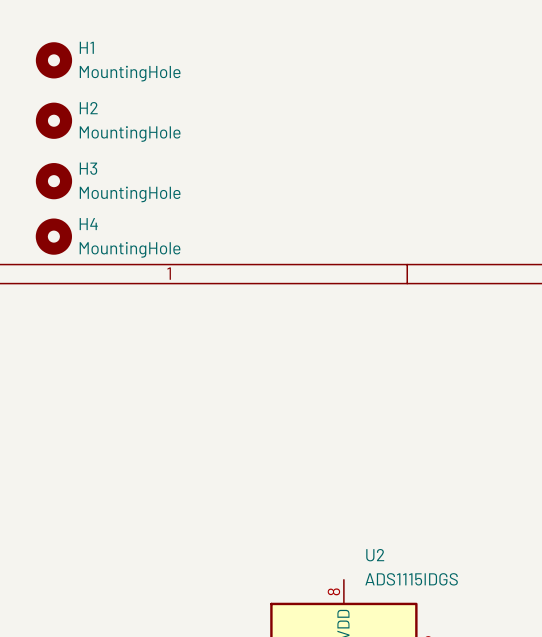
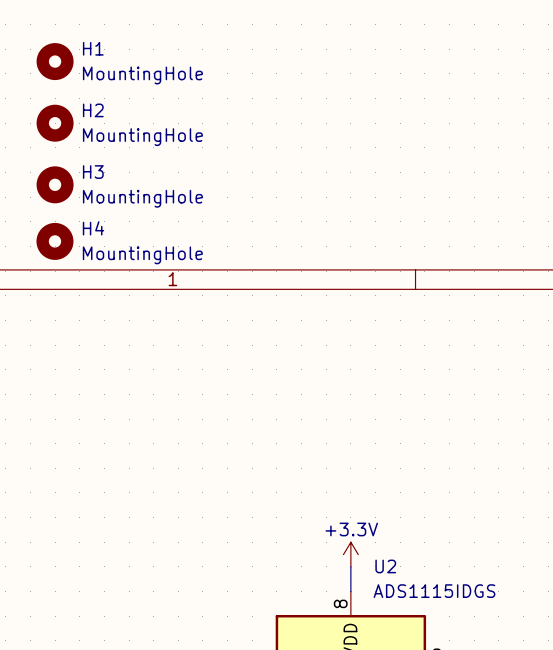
power symbol: none -> +3.3V (350, 554)
wire: none -> (350, 566) (350, 591)

